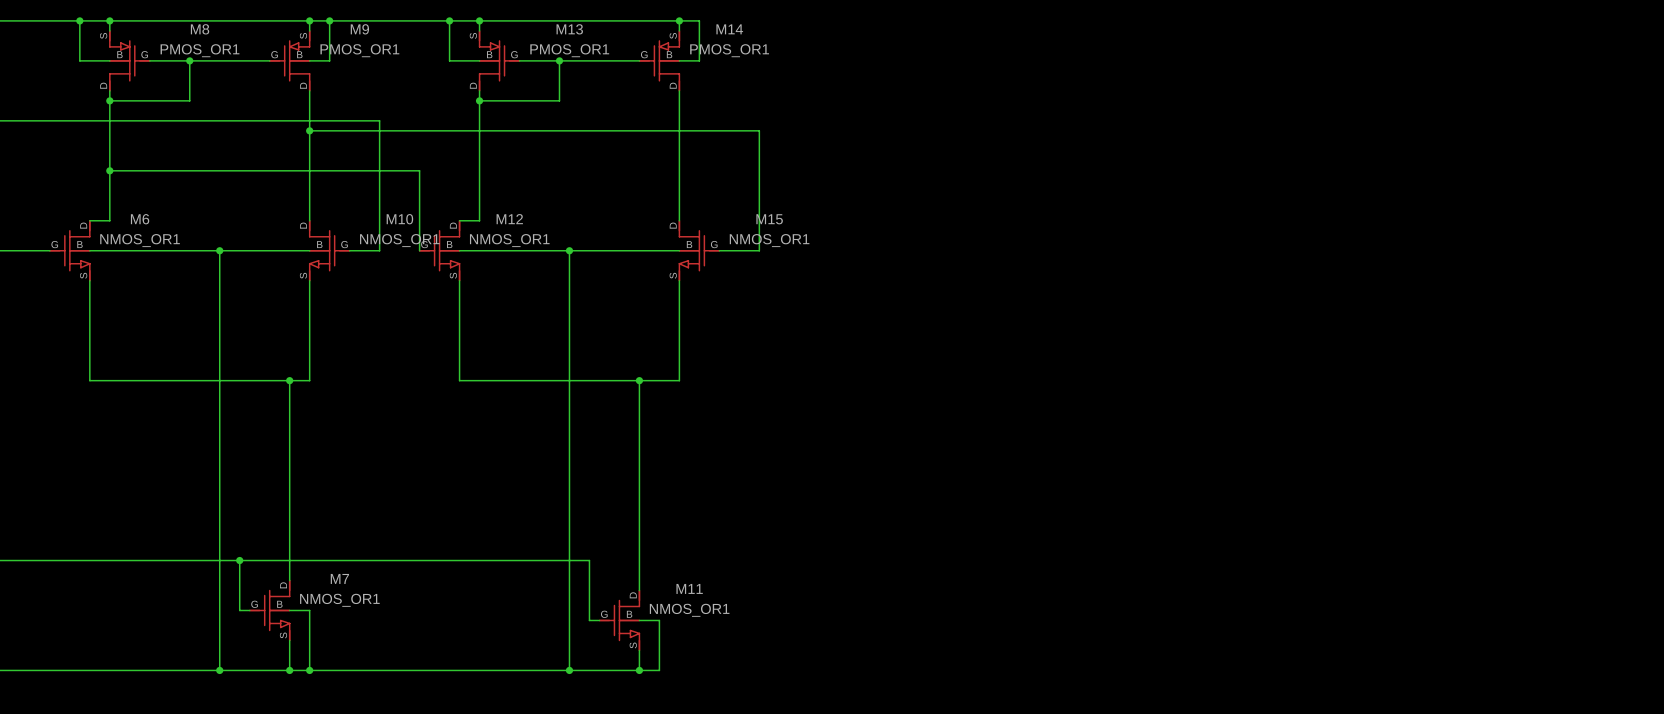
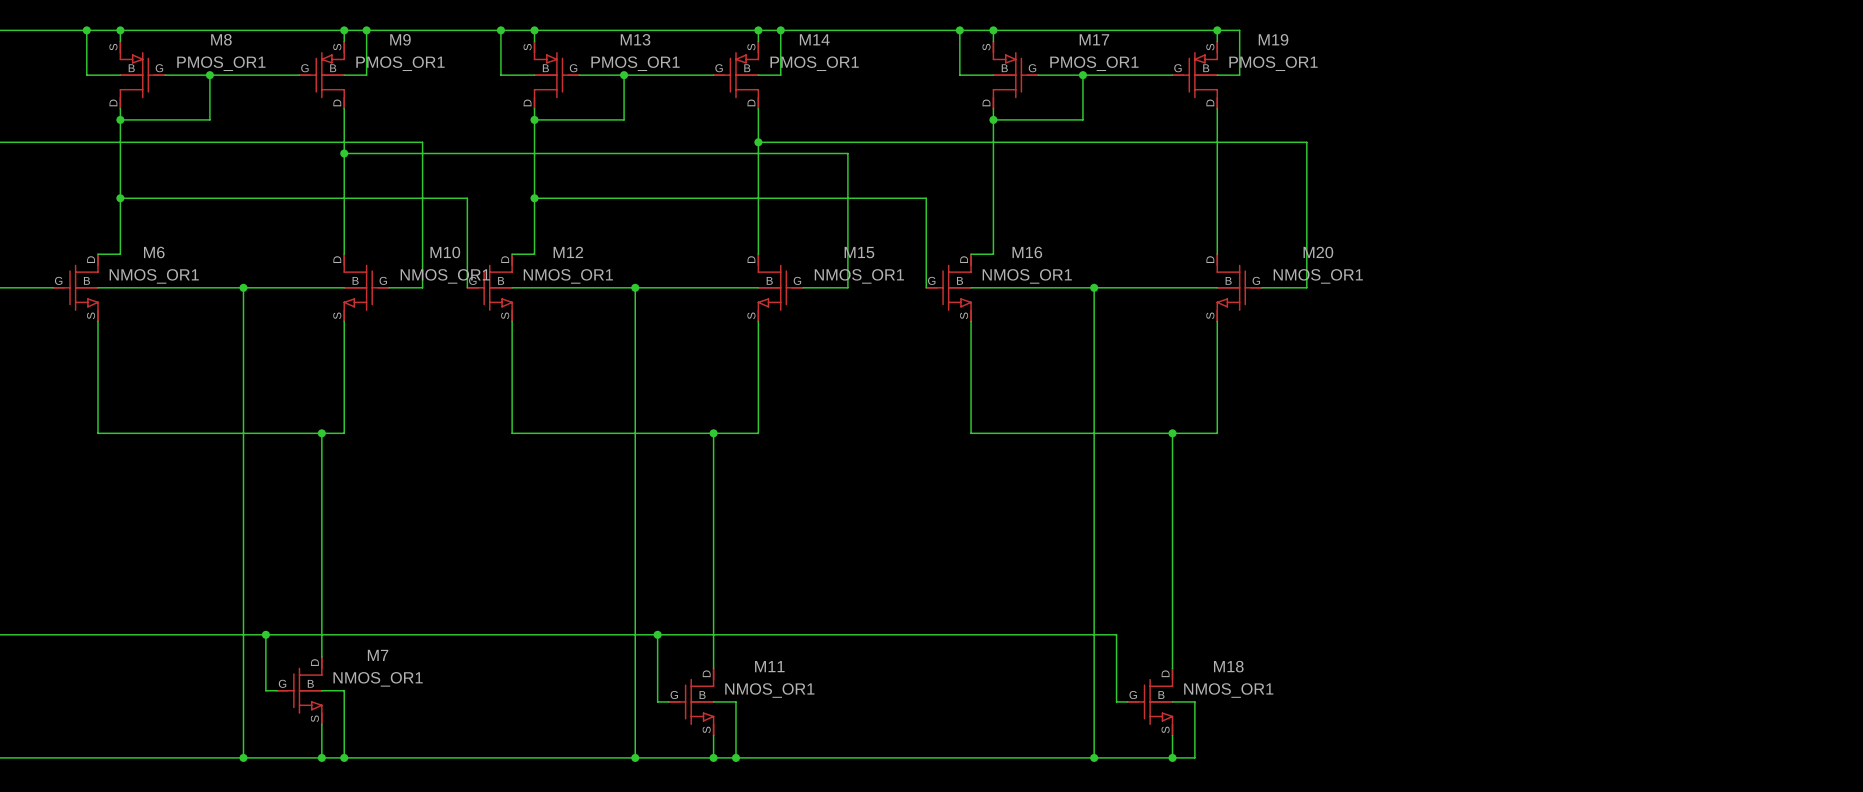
wire: none -> (780, 30) (1239, 30) (1239, 75) (1217, 75)
junction: none -> (780, 30)
wire: none -> (959, 30) (959, 75) (993, 75)
junction: none -> (959, 30)
wire: none -> (993, 30) (993, 41)
junction: none -> (993, 30)
wire: none -> (1217, 30) (1217, 41)
junction: none -> (1217, 30)
M17: none -> PMOS_OR1 (1015, 75)
wire: none -> (1038, 75) (1172, 75)
wire: none -> (1082, 75) (1082, 119) (993, 119)
junction: none -> (1082, 75)
M19: none -> PMOS_OR1 (1194, 75)
wire: none -> (993, 108) (993, 254) (971, 254)
wire: none -> (1217, 108) (1217, 254)
junction: none -> (993, 119)
wire: none -> (758, 142) (1306, 142) (1306, 287) (1262, 287)
junction: none -> (758, 142)
wire: none -> (534, 198) (926, 198) (926, 287)
junction: none -> (534, 198)
M16: none -> NMOS_OR1 (948, 287)
wire: none -> (971, 287) (1217, 287)
wire: none -> (1094, 287) (1094, 757)
junction: none -> (1094, 287)
M20: none -> NMOS_OR1 (1239, 287)
wire: none -> (971, 321) (971, 433) (1217, 433) (1217, 321)
wire: none -> (1172, 433) (1172, 668)
junction: none -> (1172, 433)
wire: none -> (657, 634) (1116, 634) (1116, 701) (1127, 701)
junction: none -> (657, 634)
M18: none -> NMOS_OR1 (1150, 701)
wire: none -> (1172, 701) (1194, 701) (1194, 757) (735, 757)
wire: none -> (1172, 735) (1172, 757)
junction: none -> (735, 757)
junction: none -> (1094, 757)
junction: none -> (1172, 757)

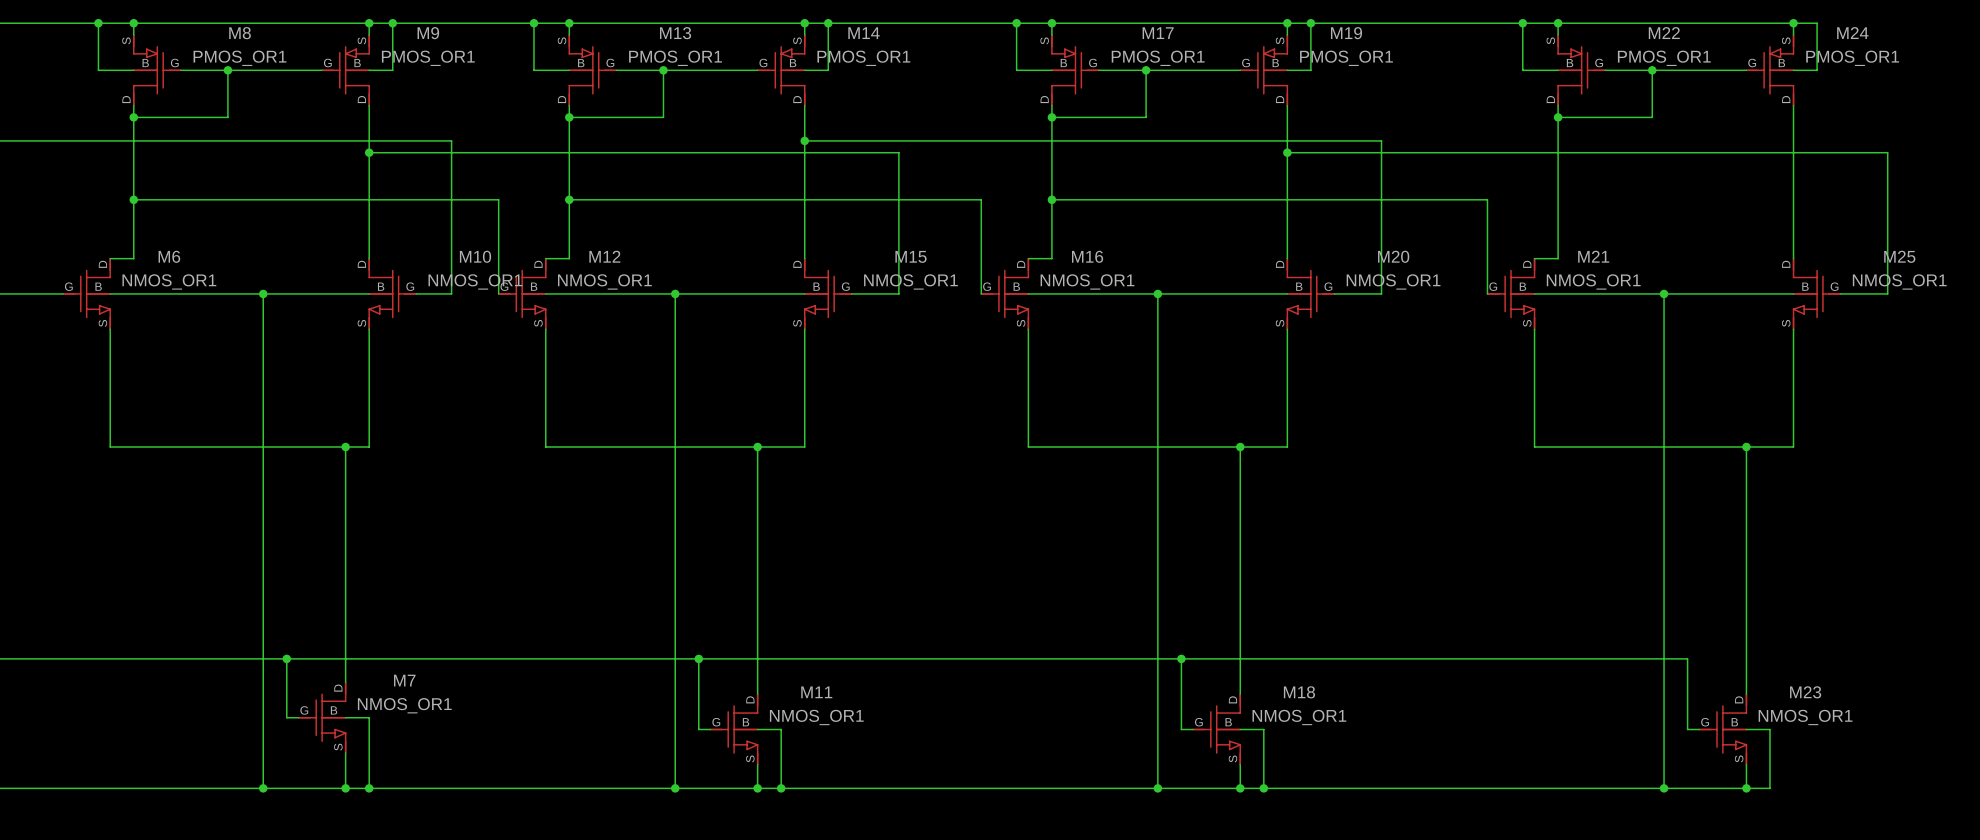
wire: none -> (1310, 23) (1817, 23) (1817, 70) (1793, 70)
junction: none -> (1310, 23)
wire: none -> (1522, 23) (1522, 70) (1558, 70)
junction: none -> (1522, 23)
wire: none -> (1558, 23) (1558, 35)
junction: none -> (1558, 23)
wire: none -> (1793, 23) (1793, 35)
junction: none -> (1793, 23)
M22: none -> PMOS_OR1 (1581, 70)
wire: none -> (1605, 70) (1746, 70)
wire: none -> (1652, 70) (1652, 117) (1558, 117)
junction: none -> (1652, 70)
M24: none -> PMOS_OR1 (1769, 70)
wire: none -> (1558, 105) (1558, 258) (1534, 258)
wire: none -> (1793, 105) (1793, 258)
junction: none -> (1558, 117)
wire: none -> (1287, 152) (1887, 152) (1887, 293) (1840, 293)
junction: none -> (1287, 152)
wire: none -> (1051, 199) (1487, 199) (1487, 293)
junction: none -> (1051, 199)
M21: none -> NMOS_OR1 (1511, 293)
wire: none -> (1534, 293) (1793, 293)
wire: none -> (1664, 293) (1664, 788)
junction: none -> (1664, 293)
M25: none -> NMOS_OR1 (1817, 293)
wire: none -> (1534, 329) (1534, 447) (1793, 447) (1793, 329)
wire: none -> (1746, 447) (1746, 694)
junction: none -> (1746, 447)
wire: none -> (1181, 658) (1687, 658) (1687, 729) (1699, 729)
junction: none -> (1181, 658)
M23: none -> NMOS_OR1 (1722, 729)
wire: none -> (1746, 729) (1769, 729) (1769, 788) (1263, 788)
wire: none -> (1746, 764) (1746, 788)
junction: none -> (1263, 788)
junction: none -> (1664, 788)
junction: none -> (1746, 788)

